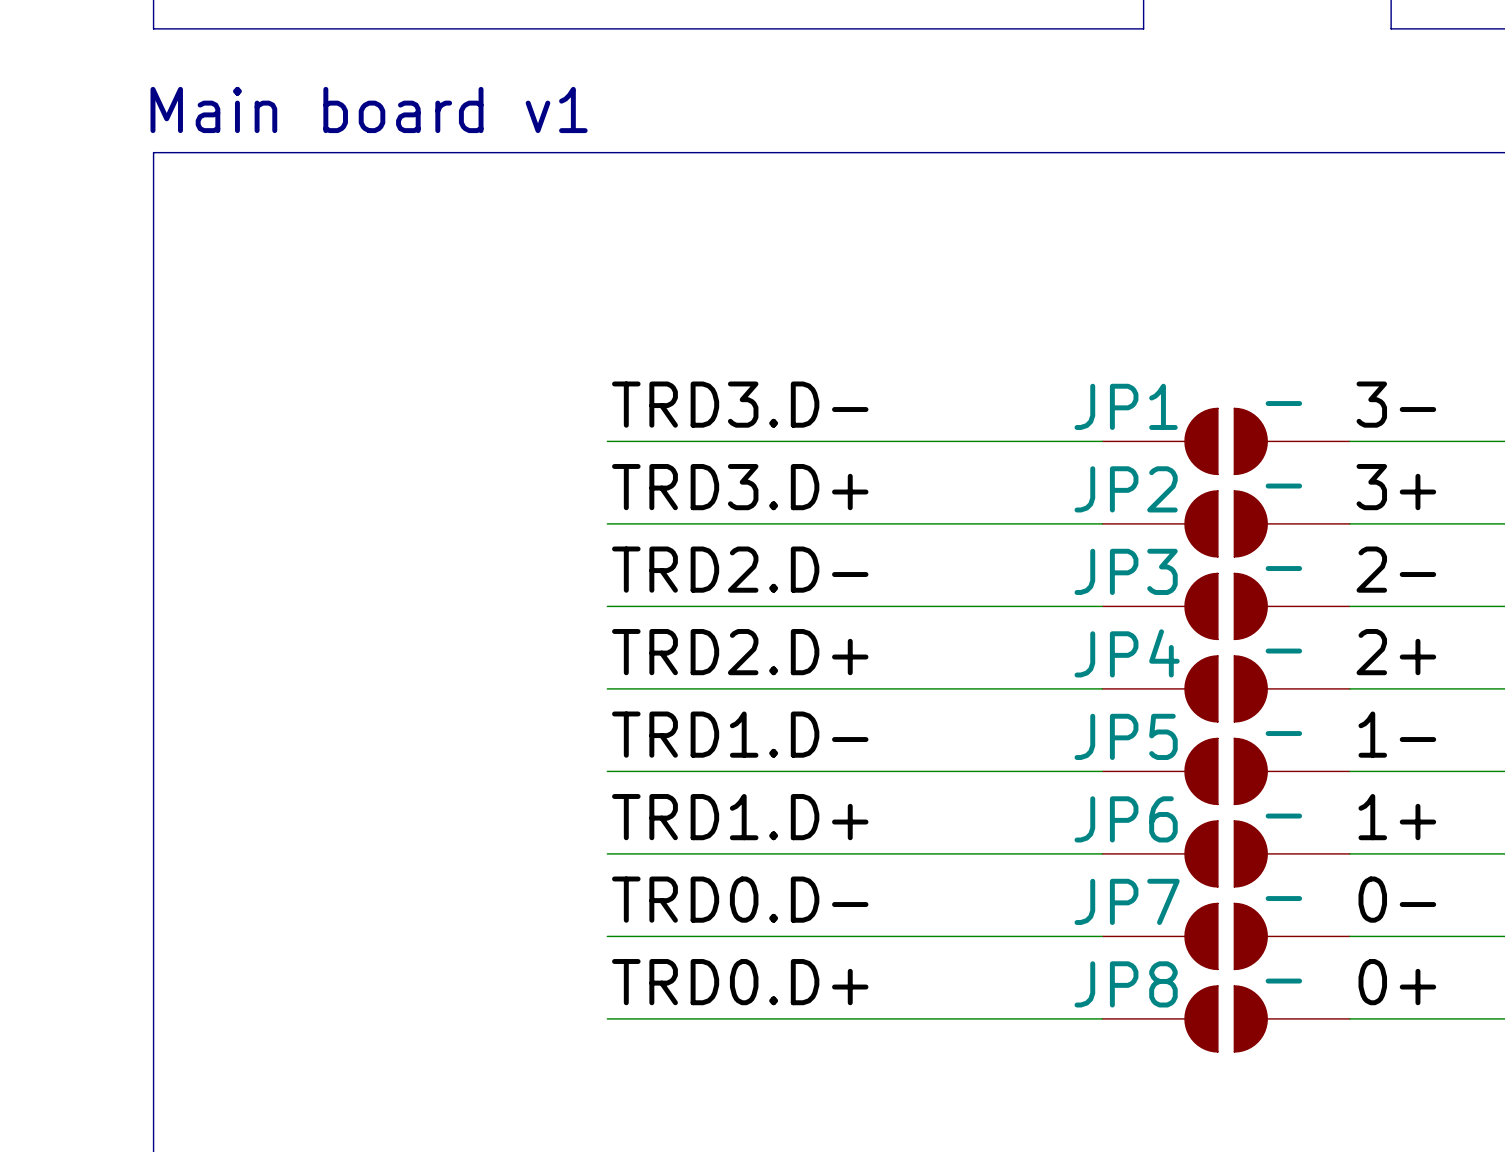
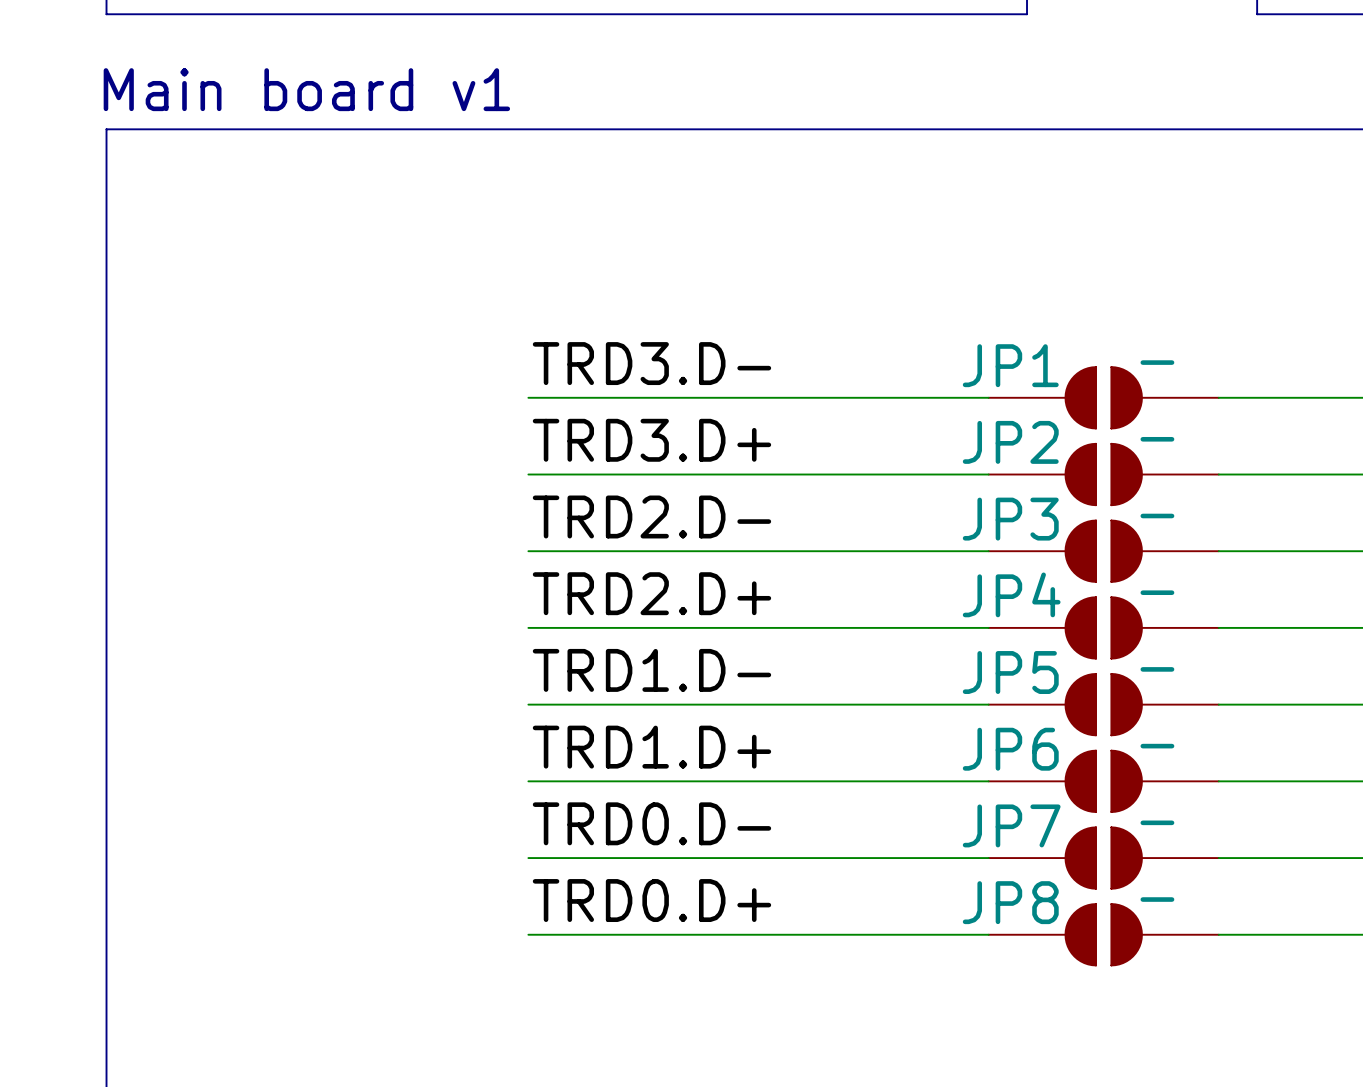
label: 3- (1396, 404) -> none
label: 3+ (1396, 487) -> none
label: 2- (1396, 569) -> none
label: 2+ (1396, 652) -> none
label: 1- (1397, 734) -> none
label: 1+ (1397, 817) -> none
label: 0- (1397, 899) -> none
label: 0+ (1397, 982) -> none

